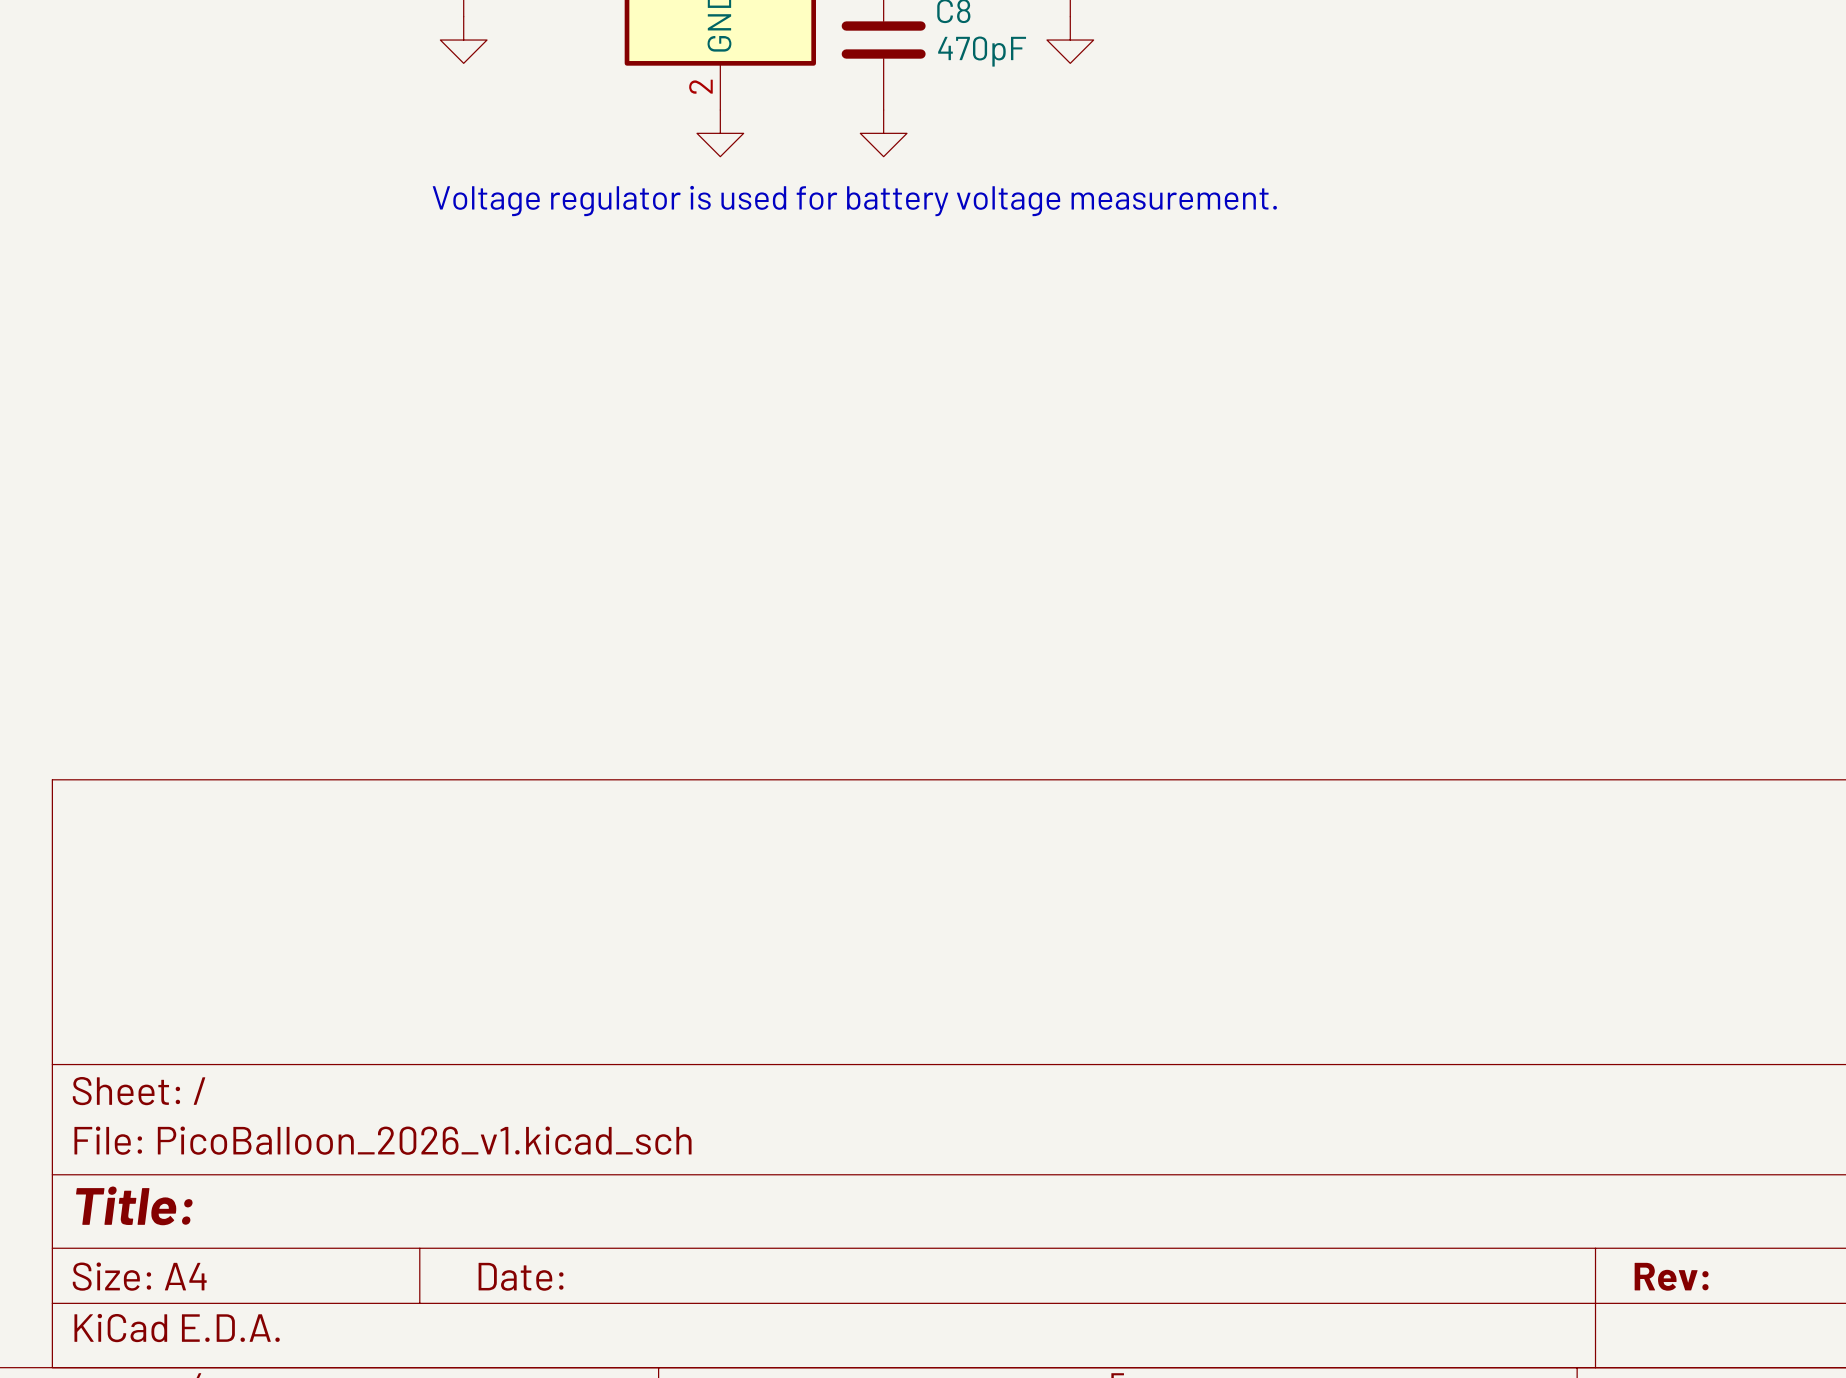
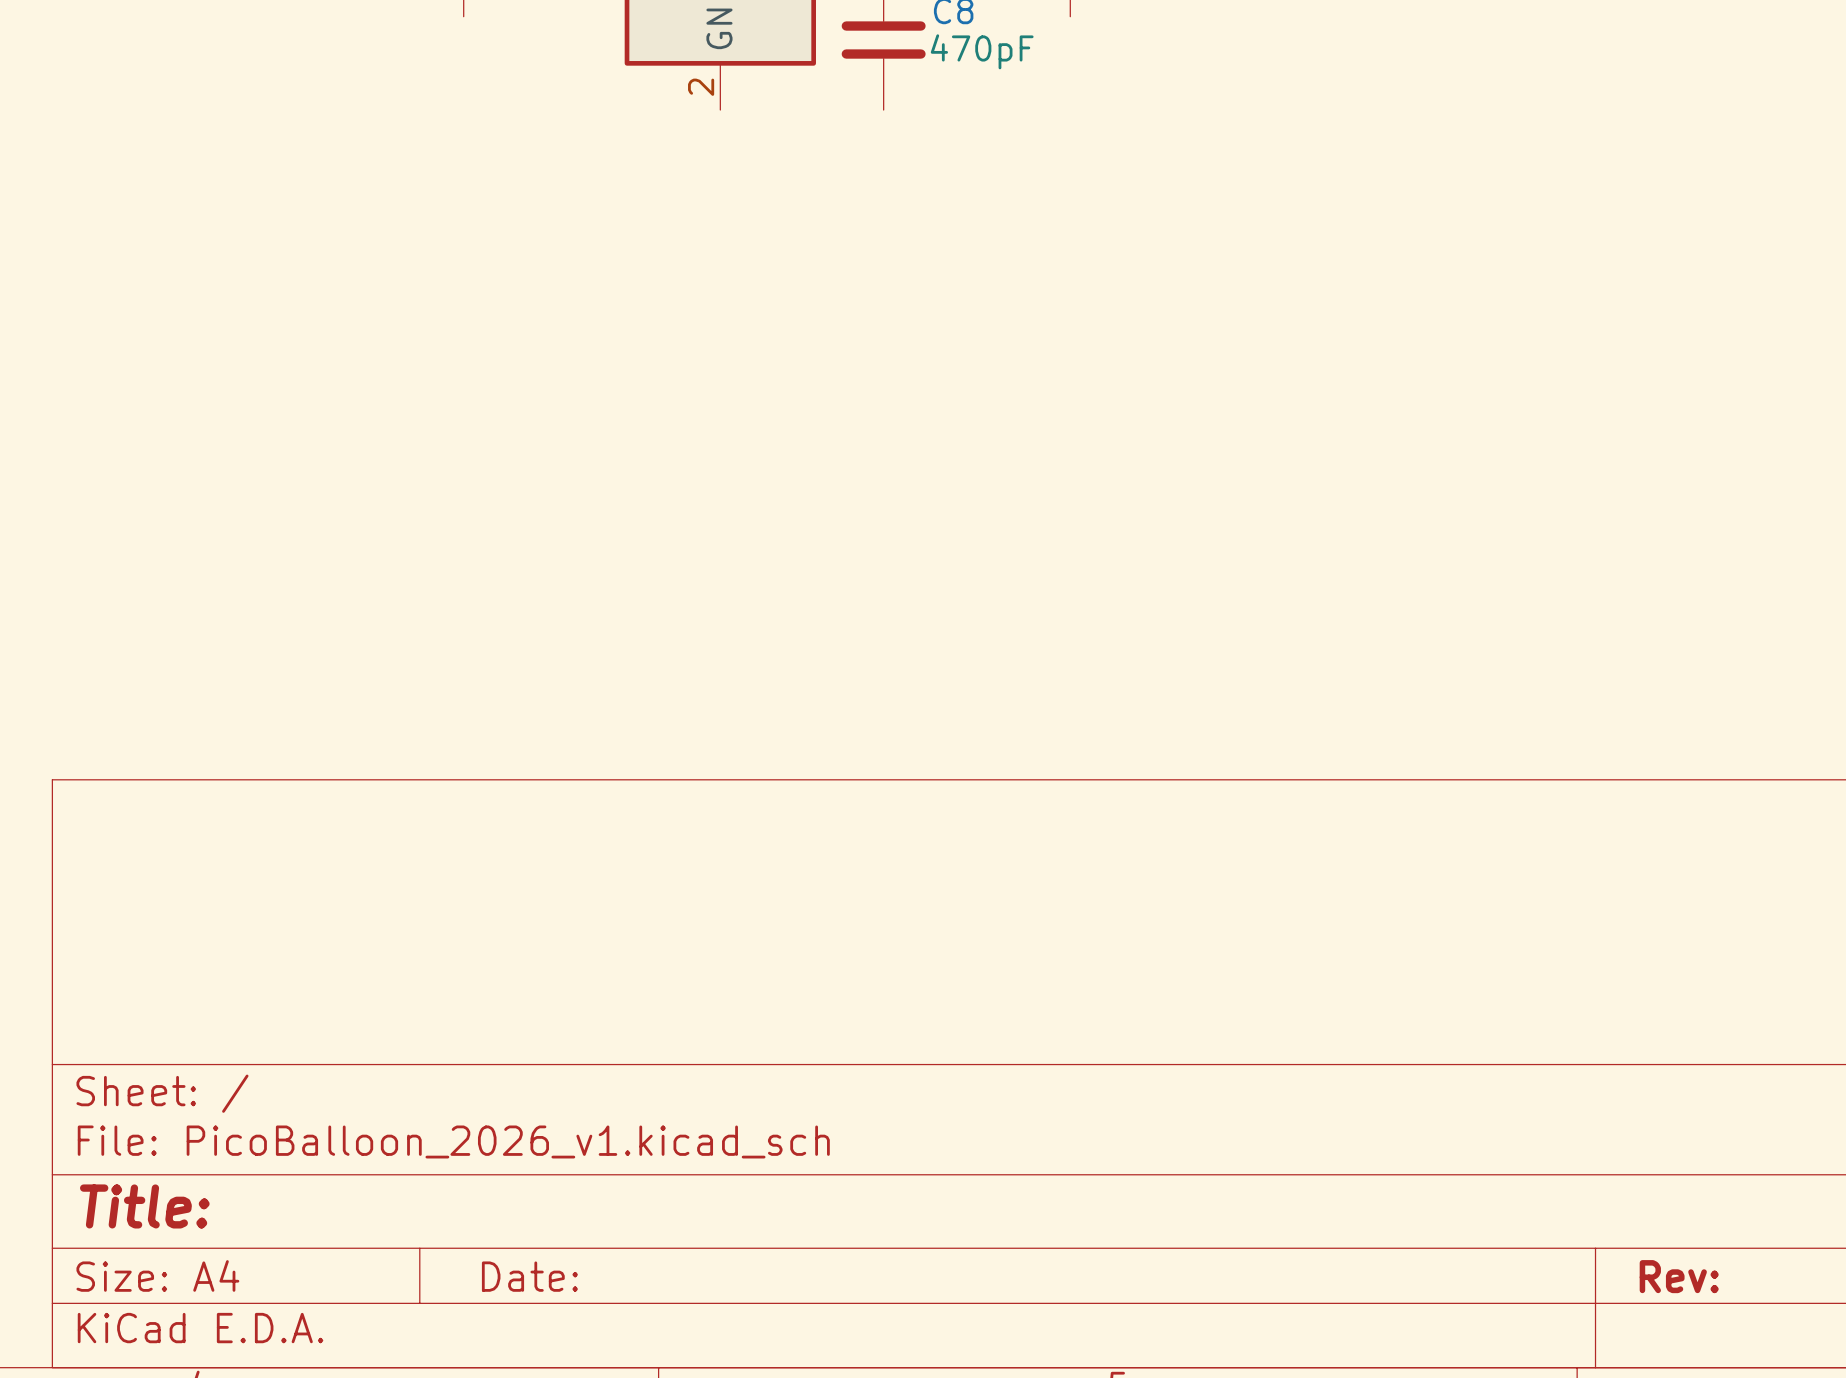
power symbol: (463, 40) -> none
power symbol: (1070, 40) -> none
power symbol: (720, 133) -> none
power symbol: (883, 133) -> none
text: Voltage regulator is used for battery voltage measurement. (854, 201) -> none

